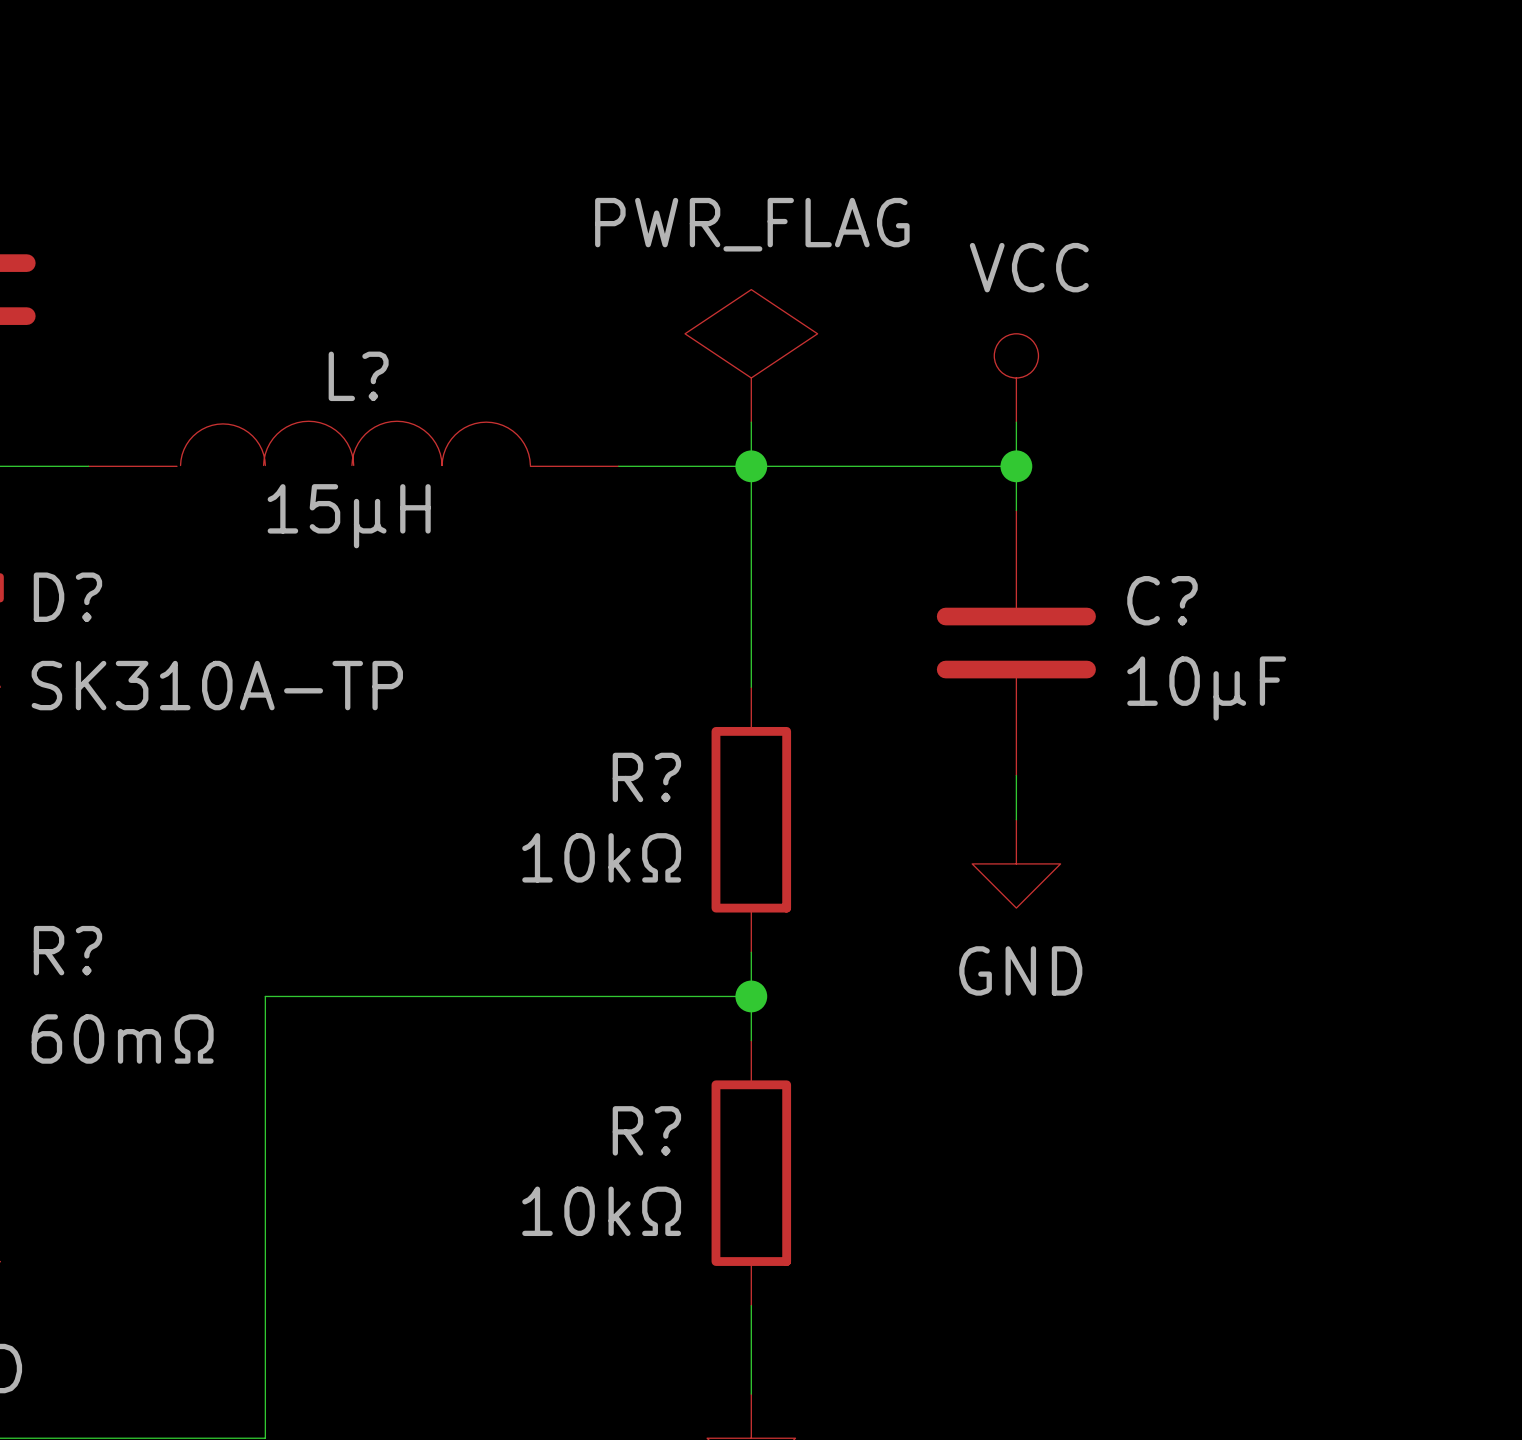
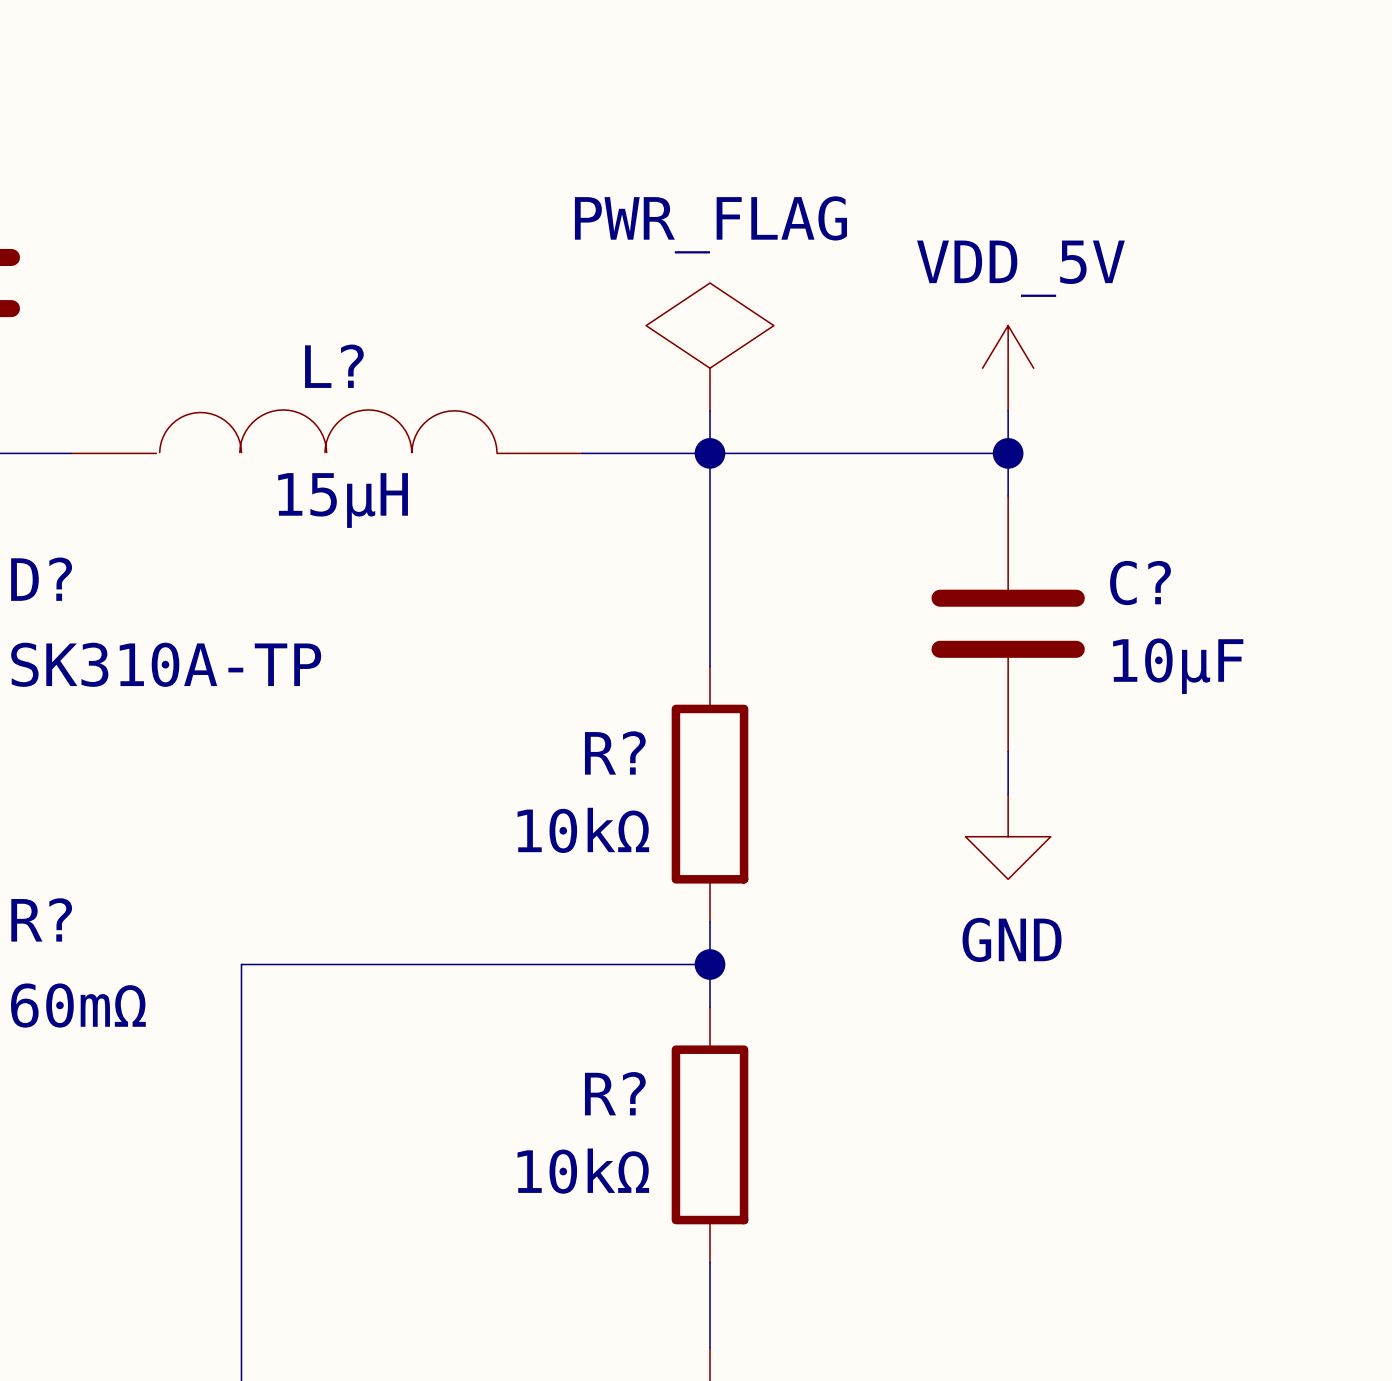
power symbol: VCC (1016, 377) -> none
power symbol: none -> VDD_5V (1008, 368)
wire: (1016, 422) (1016, 510) -> (1008, 410) (1008, 495)
wire: none -> (965, 453) (1008, 453)
junction position: (1016, 466) -> (1008, 453)
C? position: (1016, 643) -> (1008, 623)
wire: (1016, 775) (1016, 819) -> (1008, 751) (1008, 794)
power symbol position: GND (1016, 863) -> GND (1008, 836)

